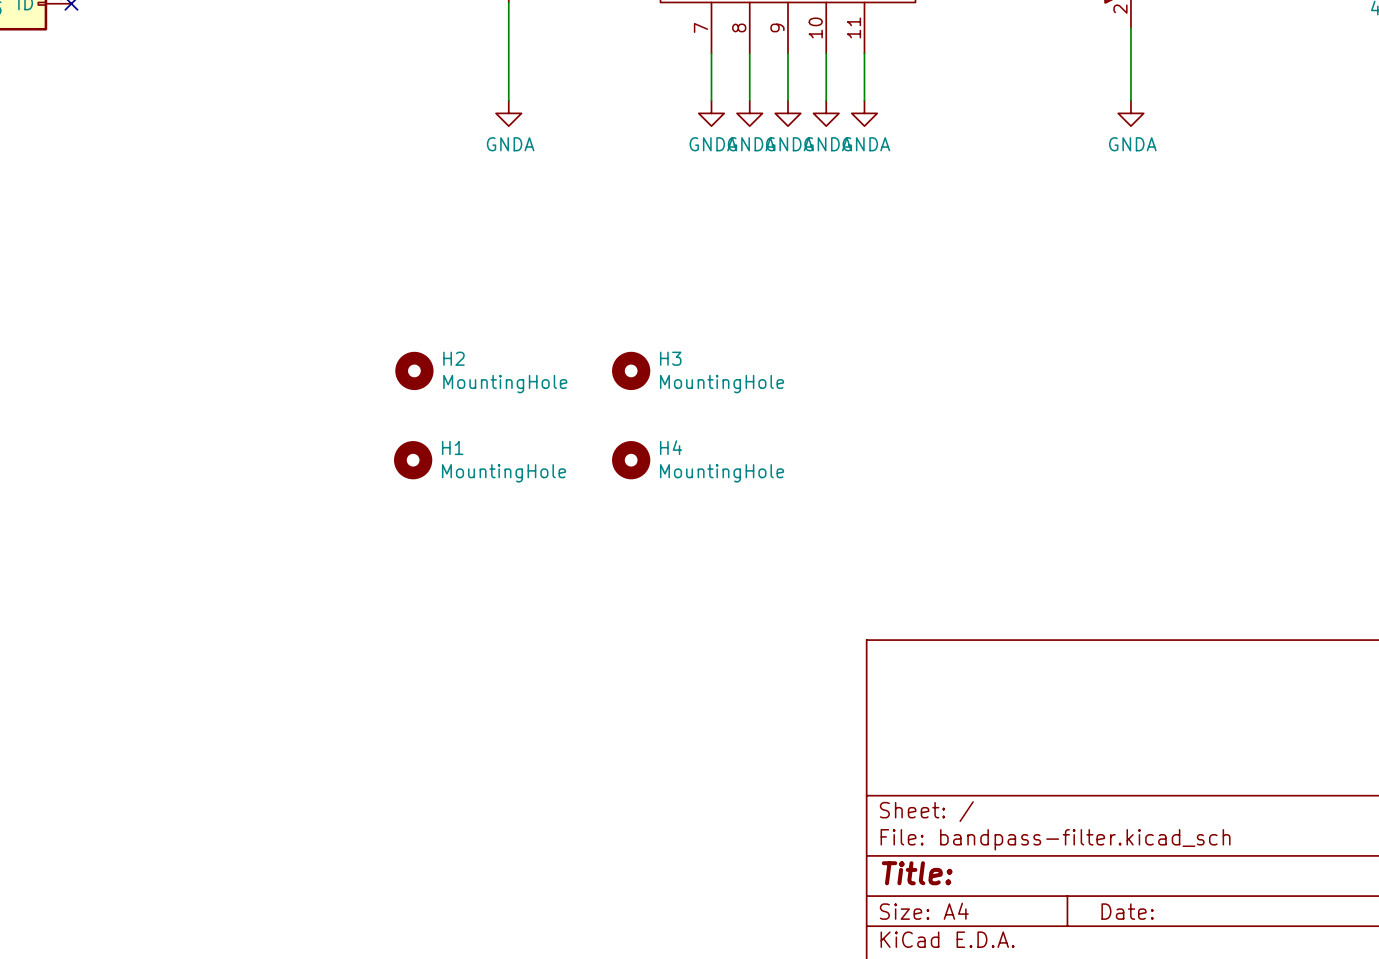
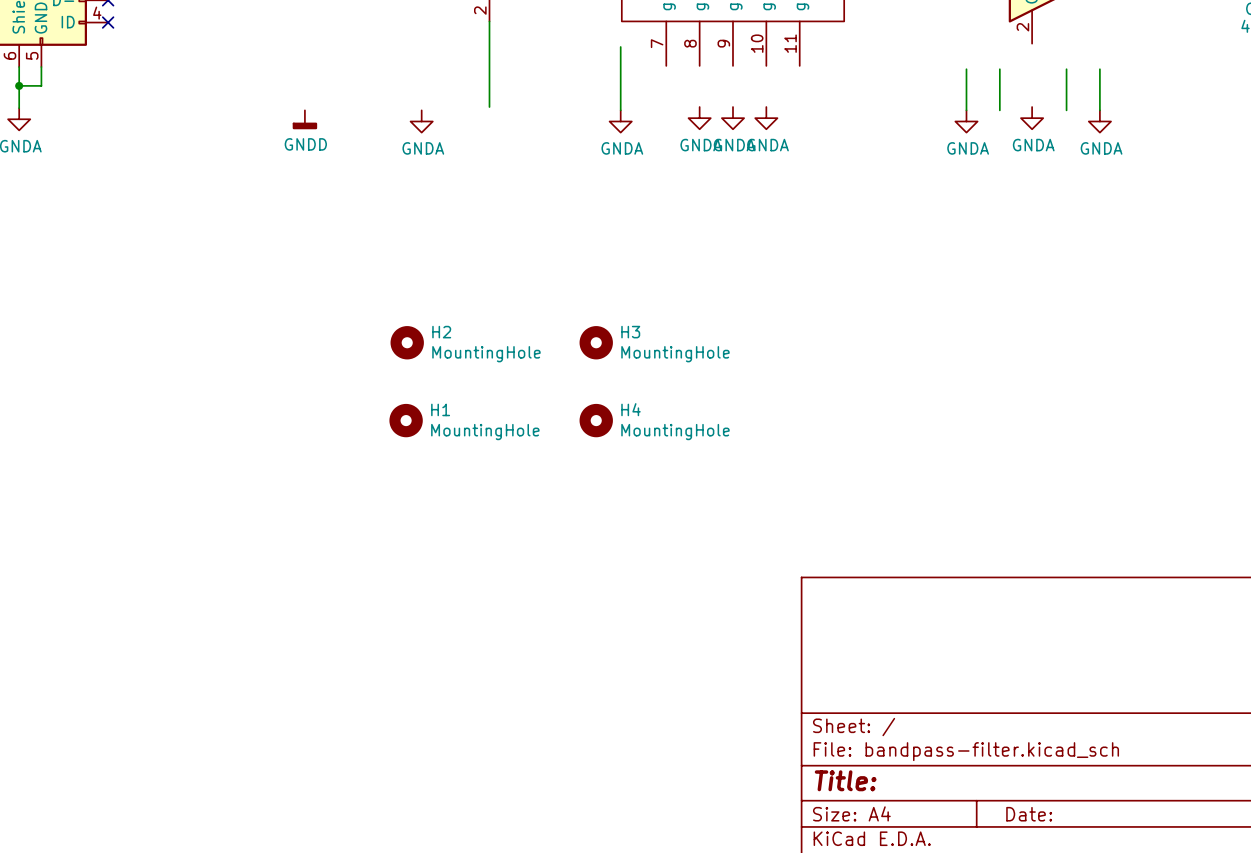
wire: (1130, 27) (1130, 100) -> none
wire: none -> (620, 46) (620, 110)
wire: (711, 53) (711, 100) -> none
wire: (749, 53) (749, 100) -> none
wire: (787, 53) (787, 100) -> none
wire: (826, 53) (826, 100) -> none
wire: (864, 53) (864, 100) -> (966, 69) (966, 110)
wire: none -> (999, 69) (999, 110)
wire: none -> (1066, 69) (1066, 110)
wire: none -> (1099, 69) (1099, 110)
power symbol: GNDA (508, 113) -> none
power symbol position: GNDA (711, 113) -> GNDA (620, 121)
power symbol: GNDA (864, 113) -> none
power symbol: none -> GNDD (304, 119)
power symbol: none -> GNDA (421, 121)
power symbol: none -> GNDA (966, 121)
power symbol: none -> GNDA (1099, 121)

